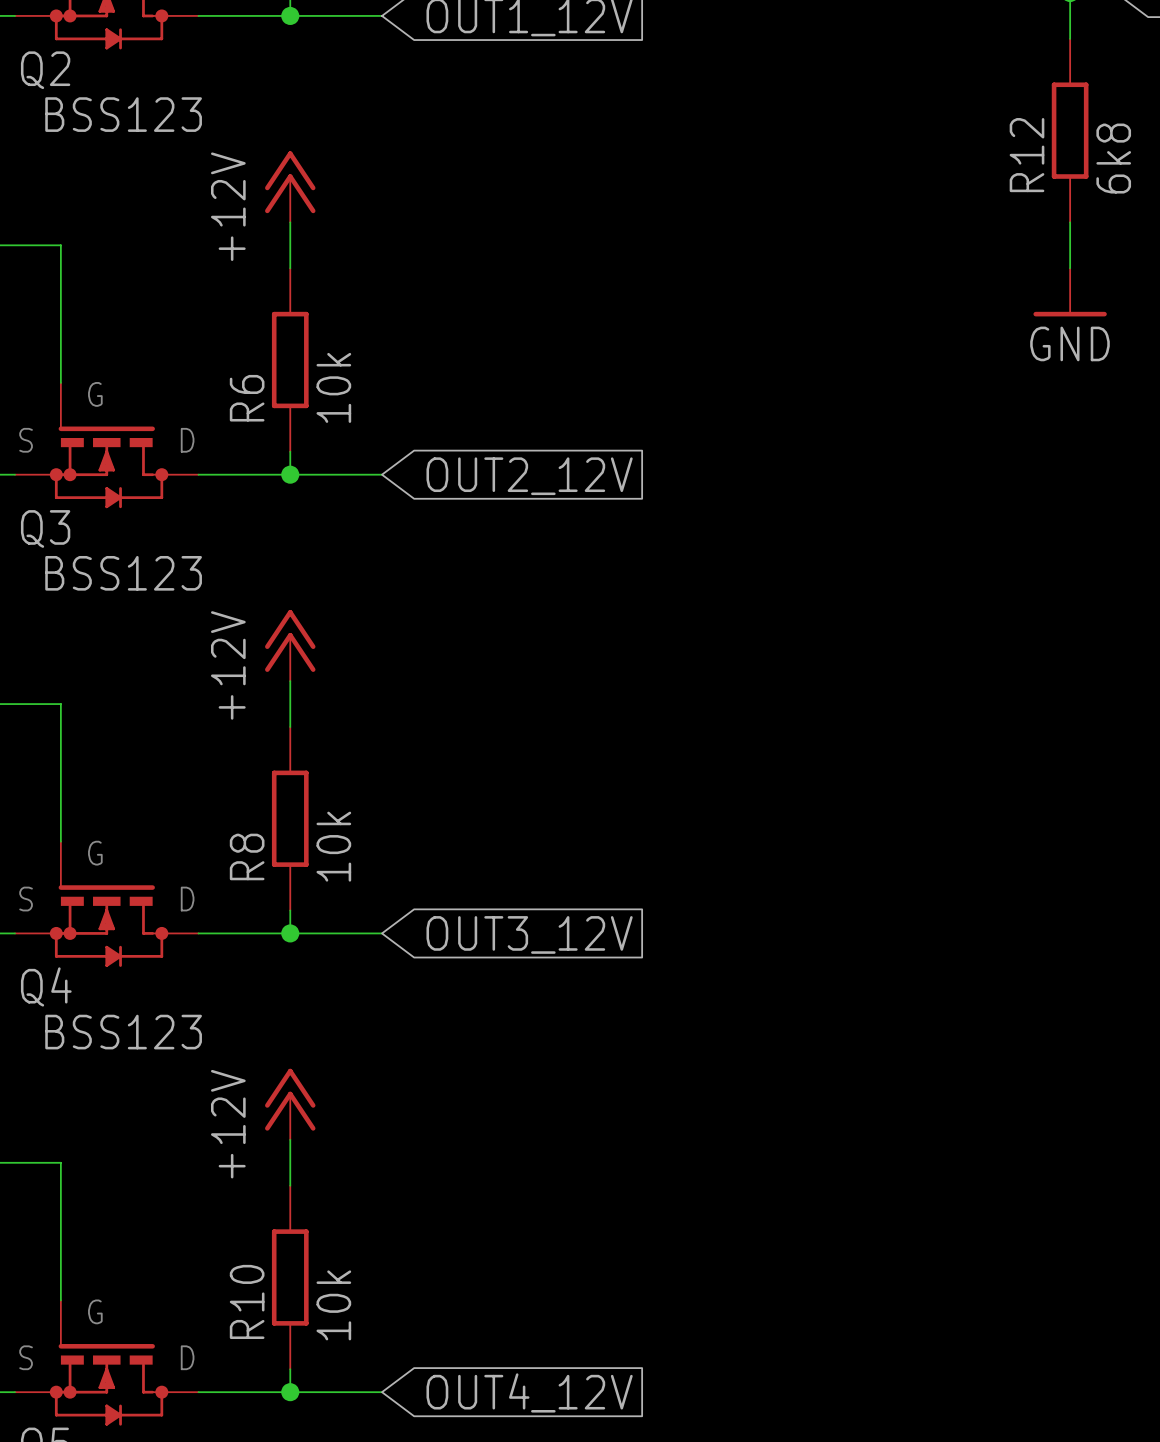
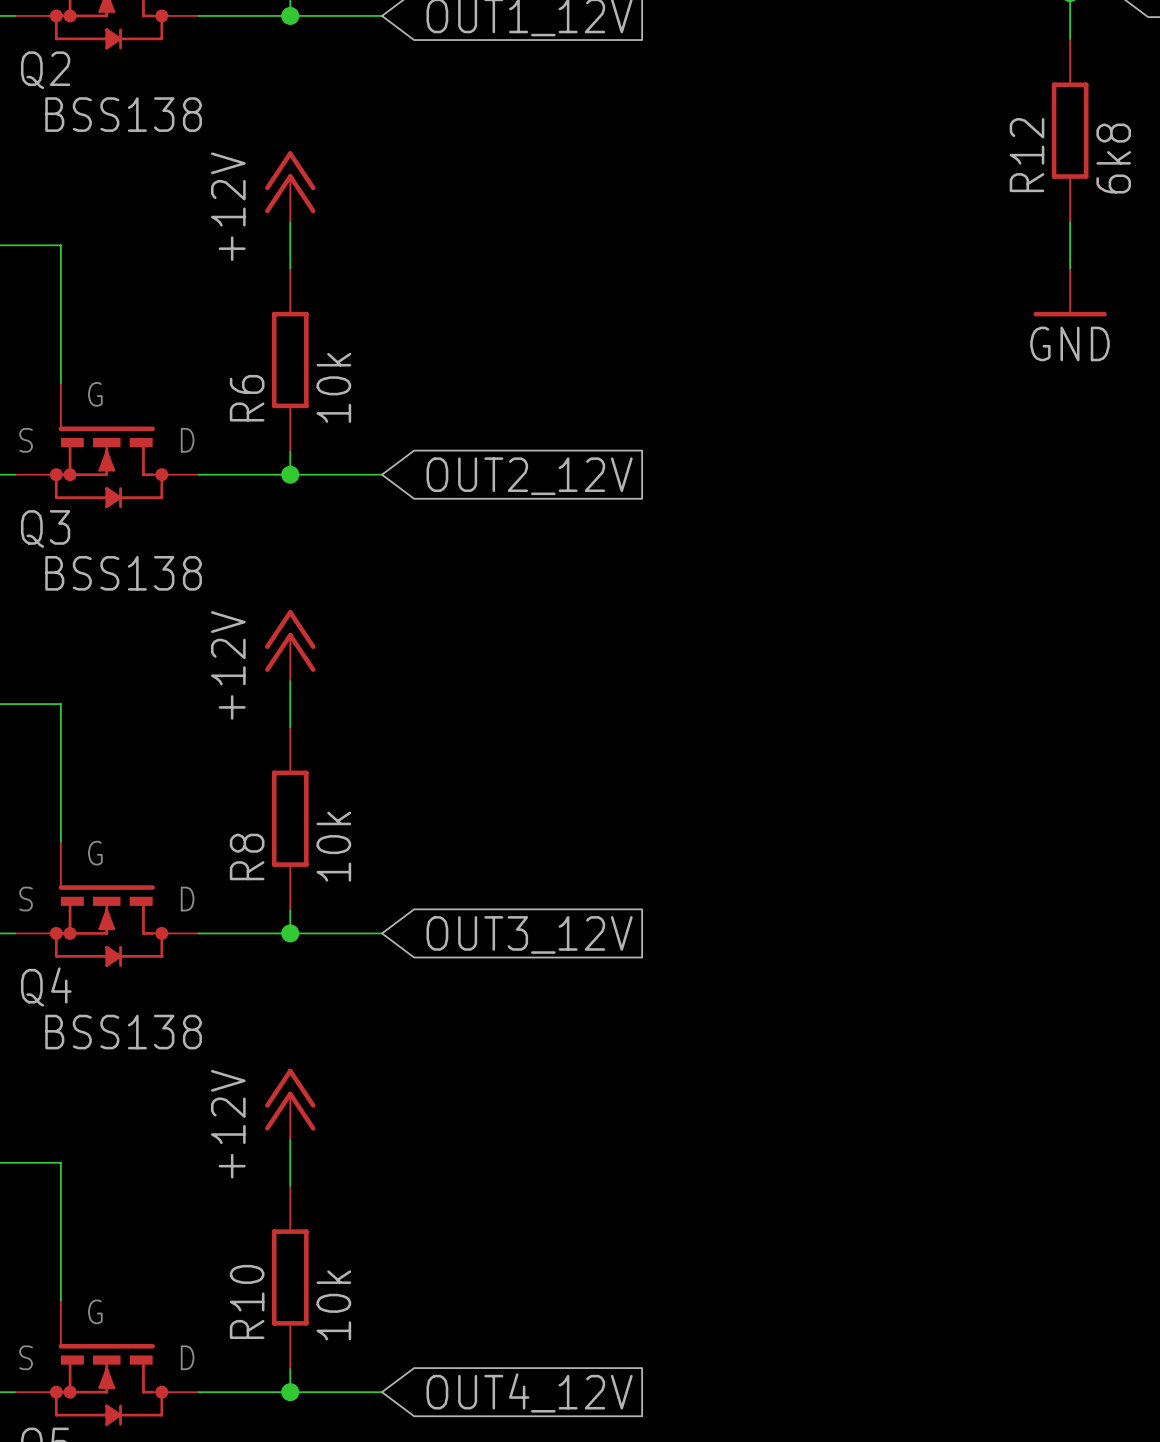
Q2 value: BSS123 (123, 114) -> BSS138 (123, 114)
Q3 value: BSS123 (123, 573) -> BSS138 (123, 573)
Q4 value: BSS123 (123, 1032) -> BSS138 (123, 1032)

